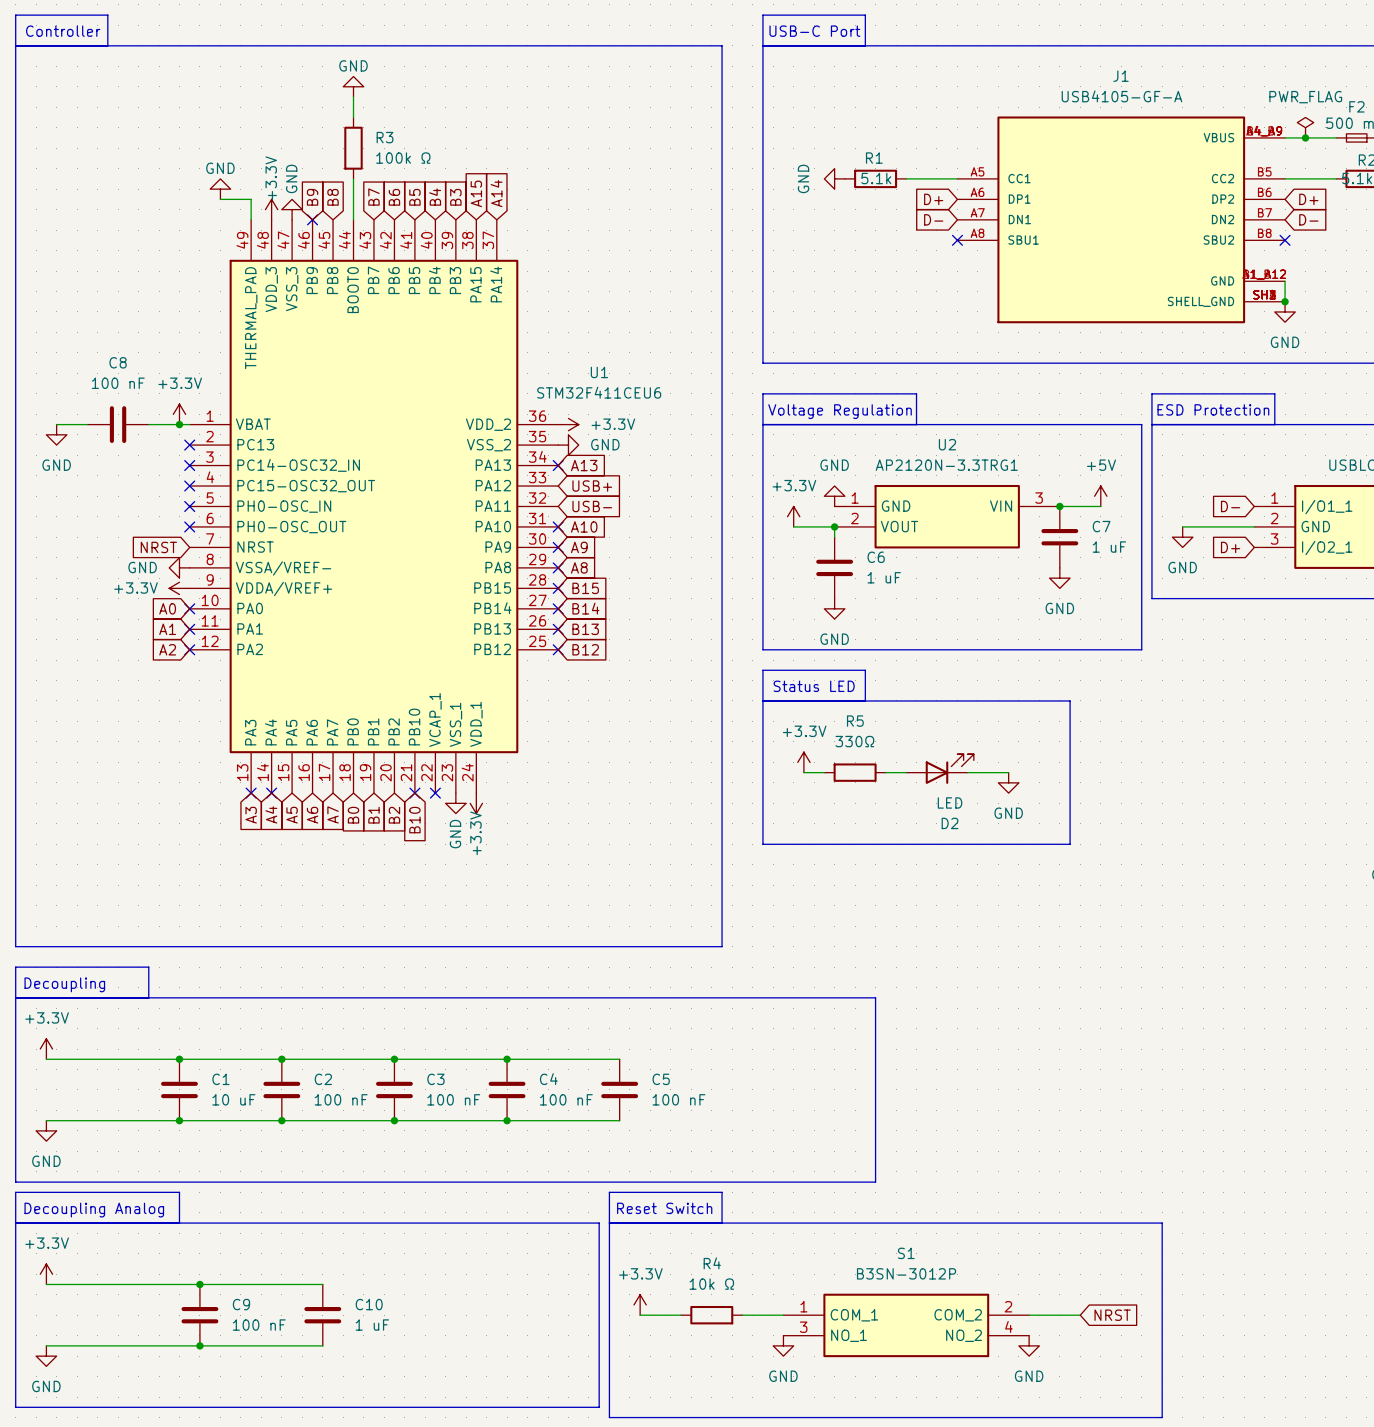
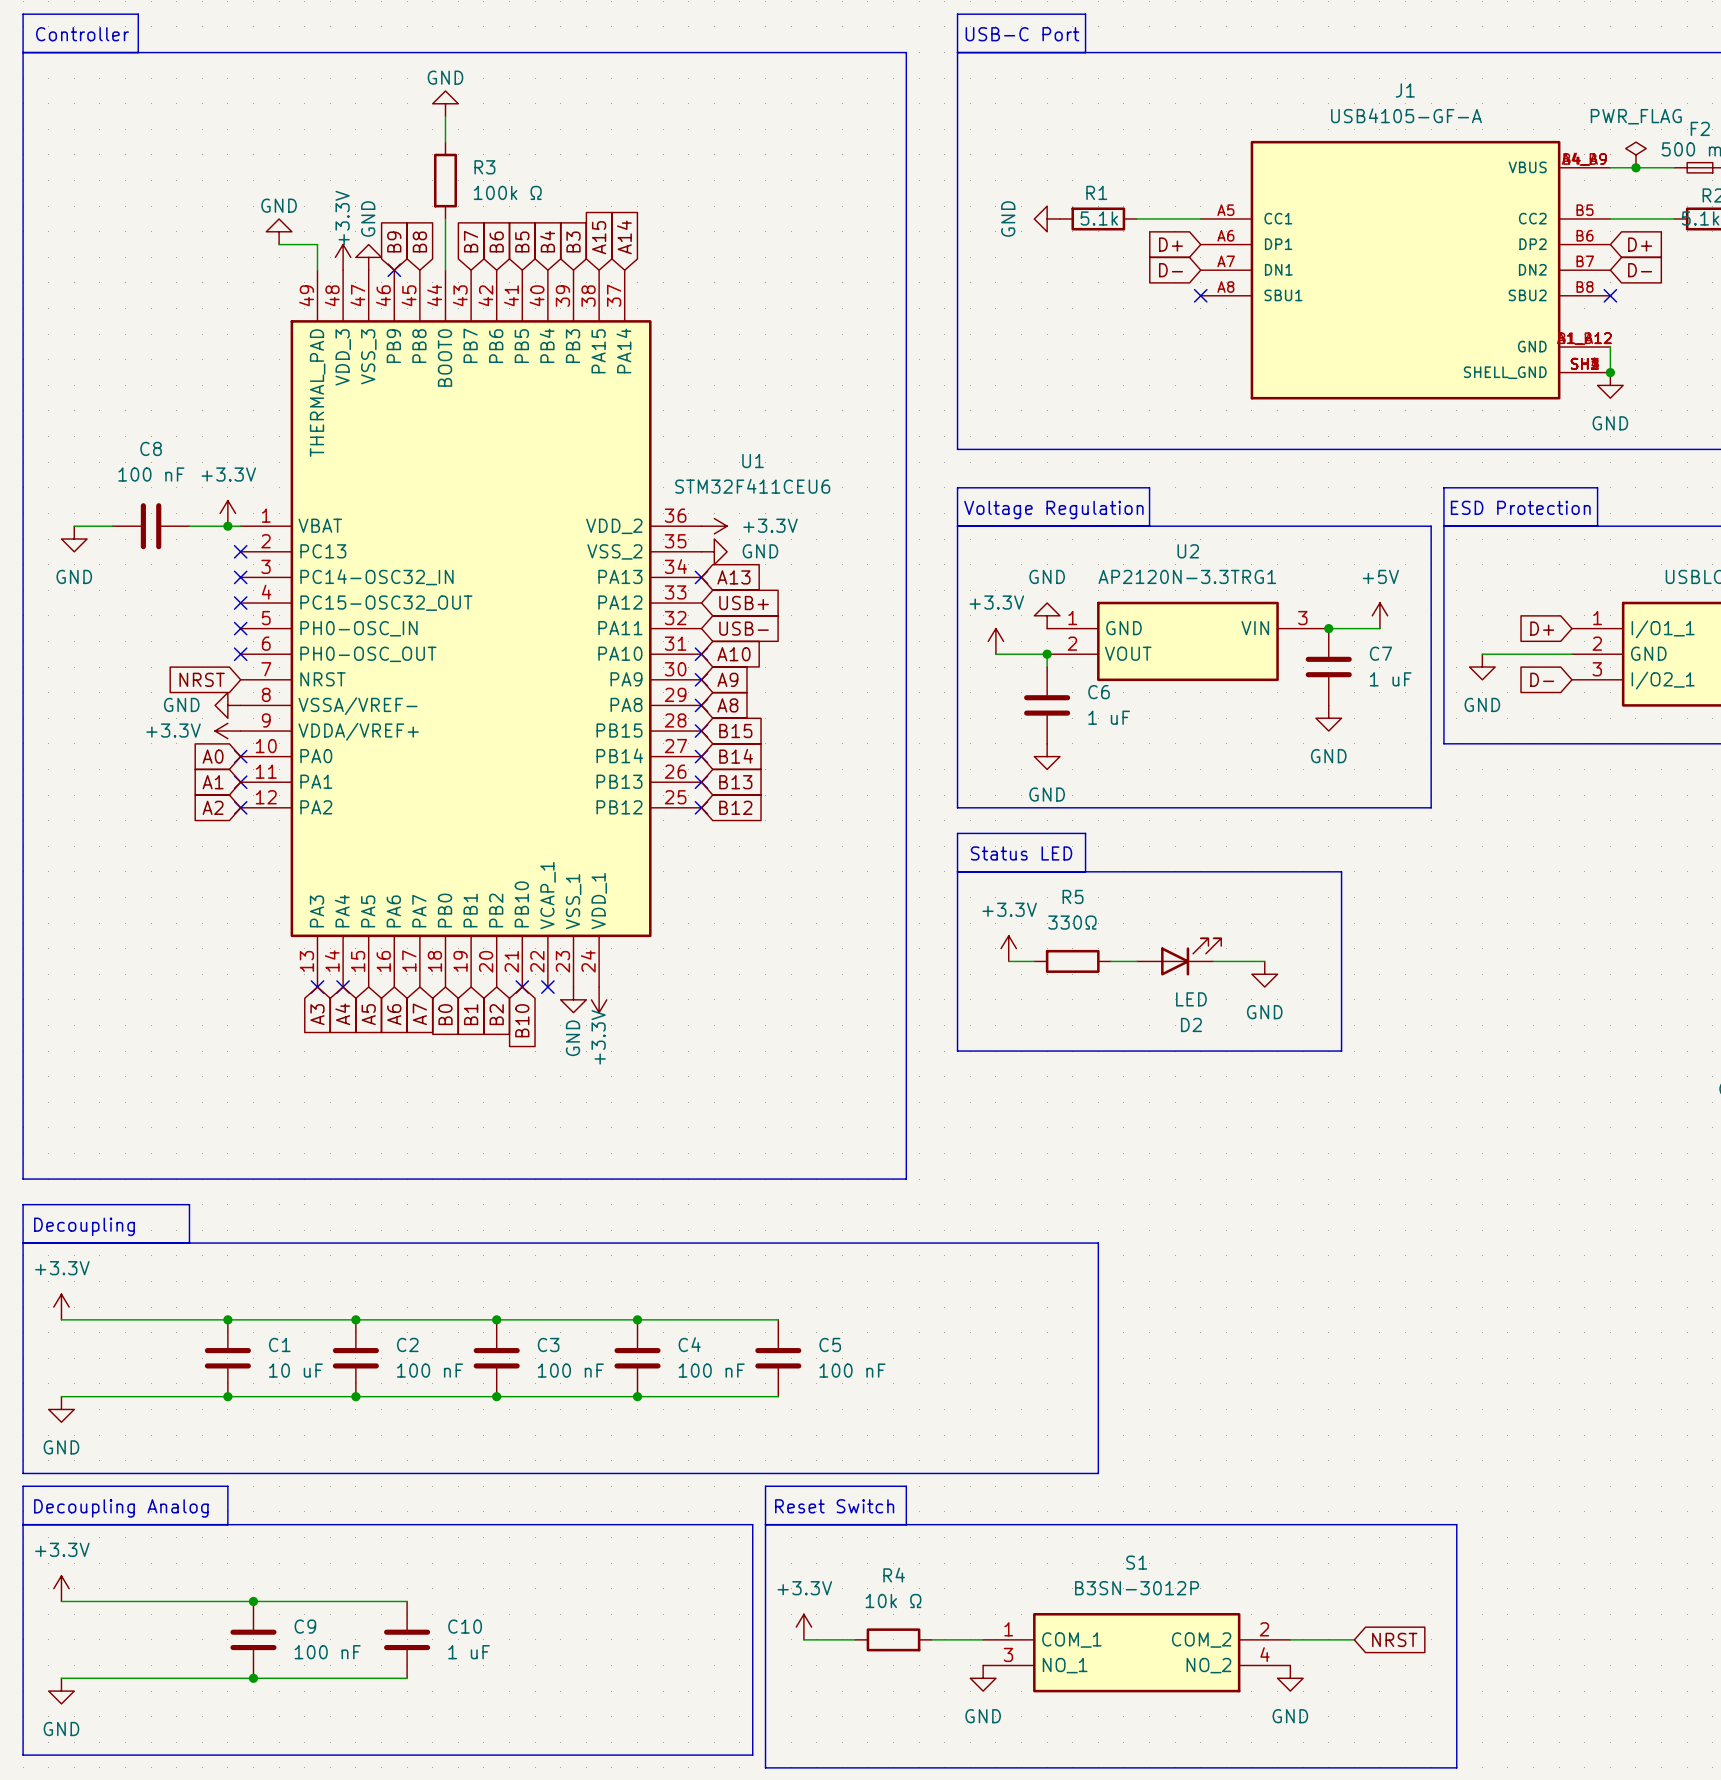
global label: D- (1230, 506) -> D+ (1542, 628)
global label: D+ (1230, 547) -> D- (1542, 679)

